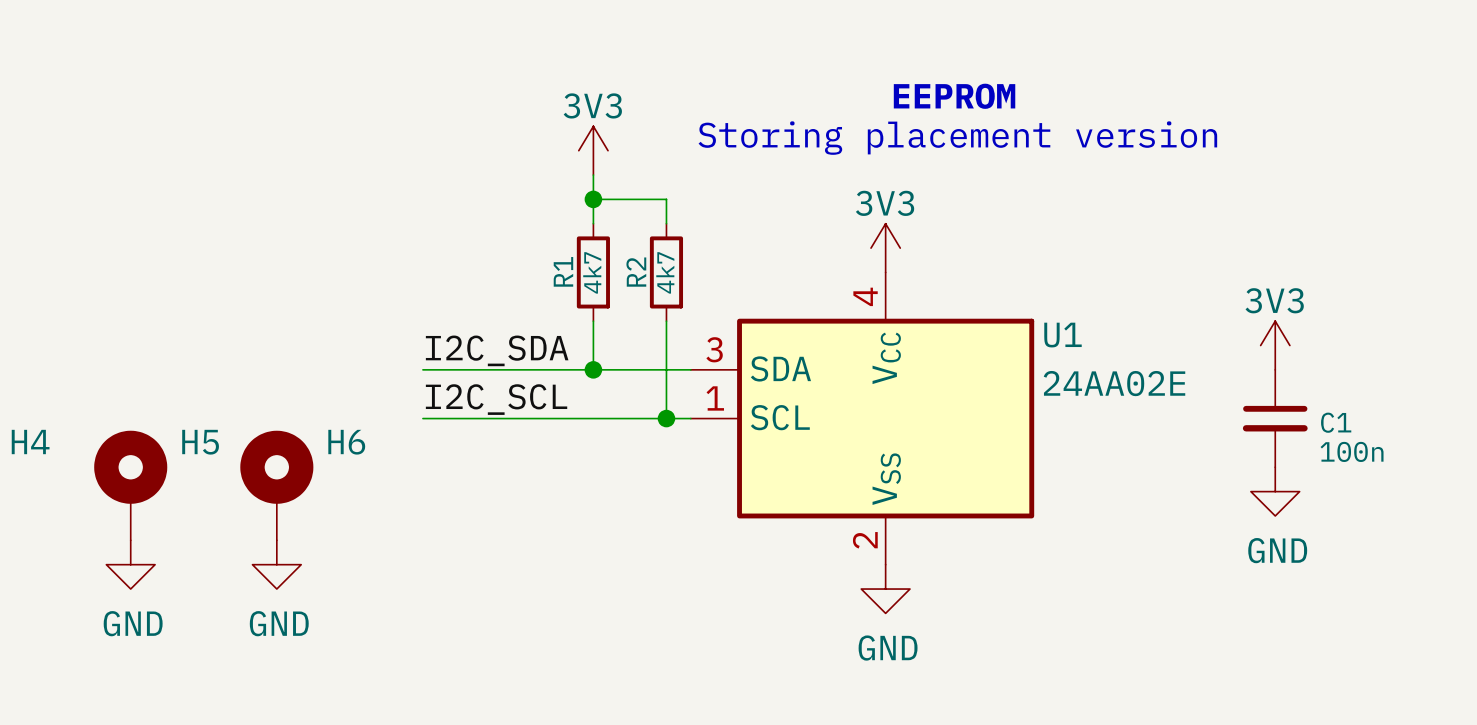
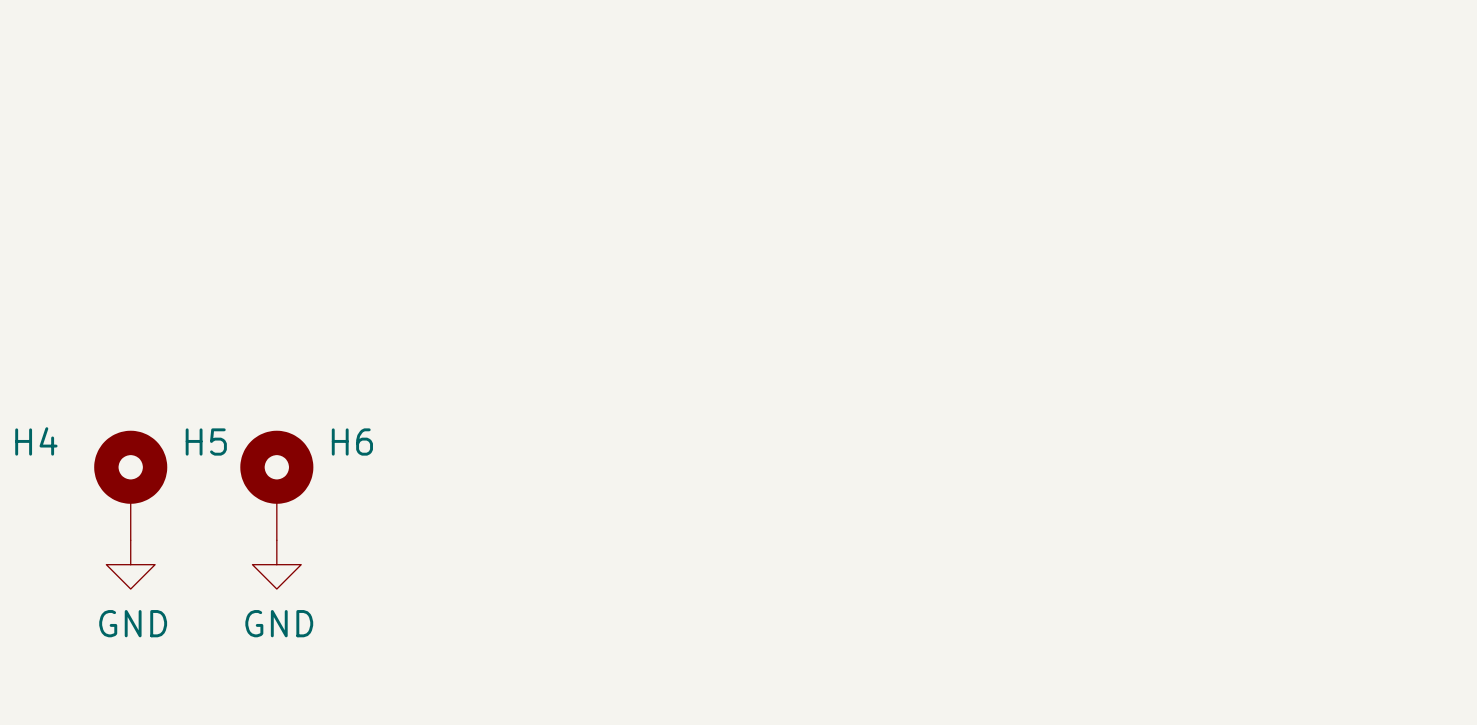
text: EEPROM (954, 96) -> none
text: Storing placement version (957, 138) -> none
power symbol: 3V3 (593, 150) -> none
wire: (593, 175) (593, 223) -> none
wire: (593, 199) (666, 199) (666, 223) -> none
junction: (593, 199) -> none
power symbol: 3V3 (885, 248) -> none
R1: 4k7 (593, 272) -> none
R2: 4k7 (666, 272) -> none
wire: (593, 321) (593, 369) -> none
wire: (666, 321) (666, 418) -> none
power symbol: 3V3 (1275, 345) -> none
label: I2C_SDA (497, 350) -> none
wire: (422, 369) (690, 369) -> none
junction: (593, 369) -> none
label: I2C_SCL (496, 399) -> none
wire: (422, 418) (690, 418) -> none
junction: (666, 418) -> none
U1: 24AA02E (862, 418) -> none
C1: 100n (1275, 418) -> none
power symbol: GND (1275, 491) -> none
power symbol: GND (885, 589) -> none

